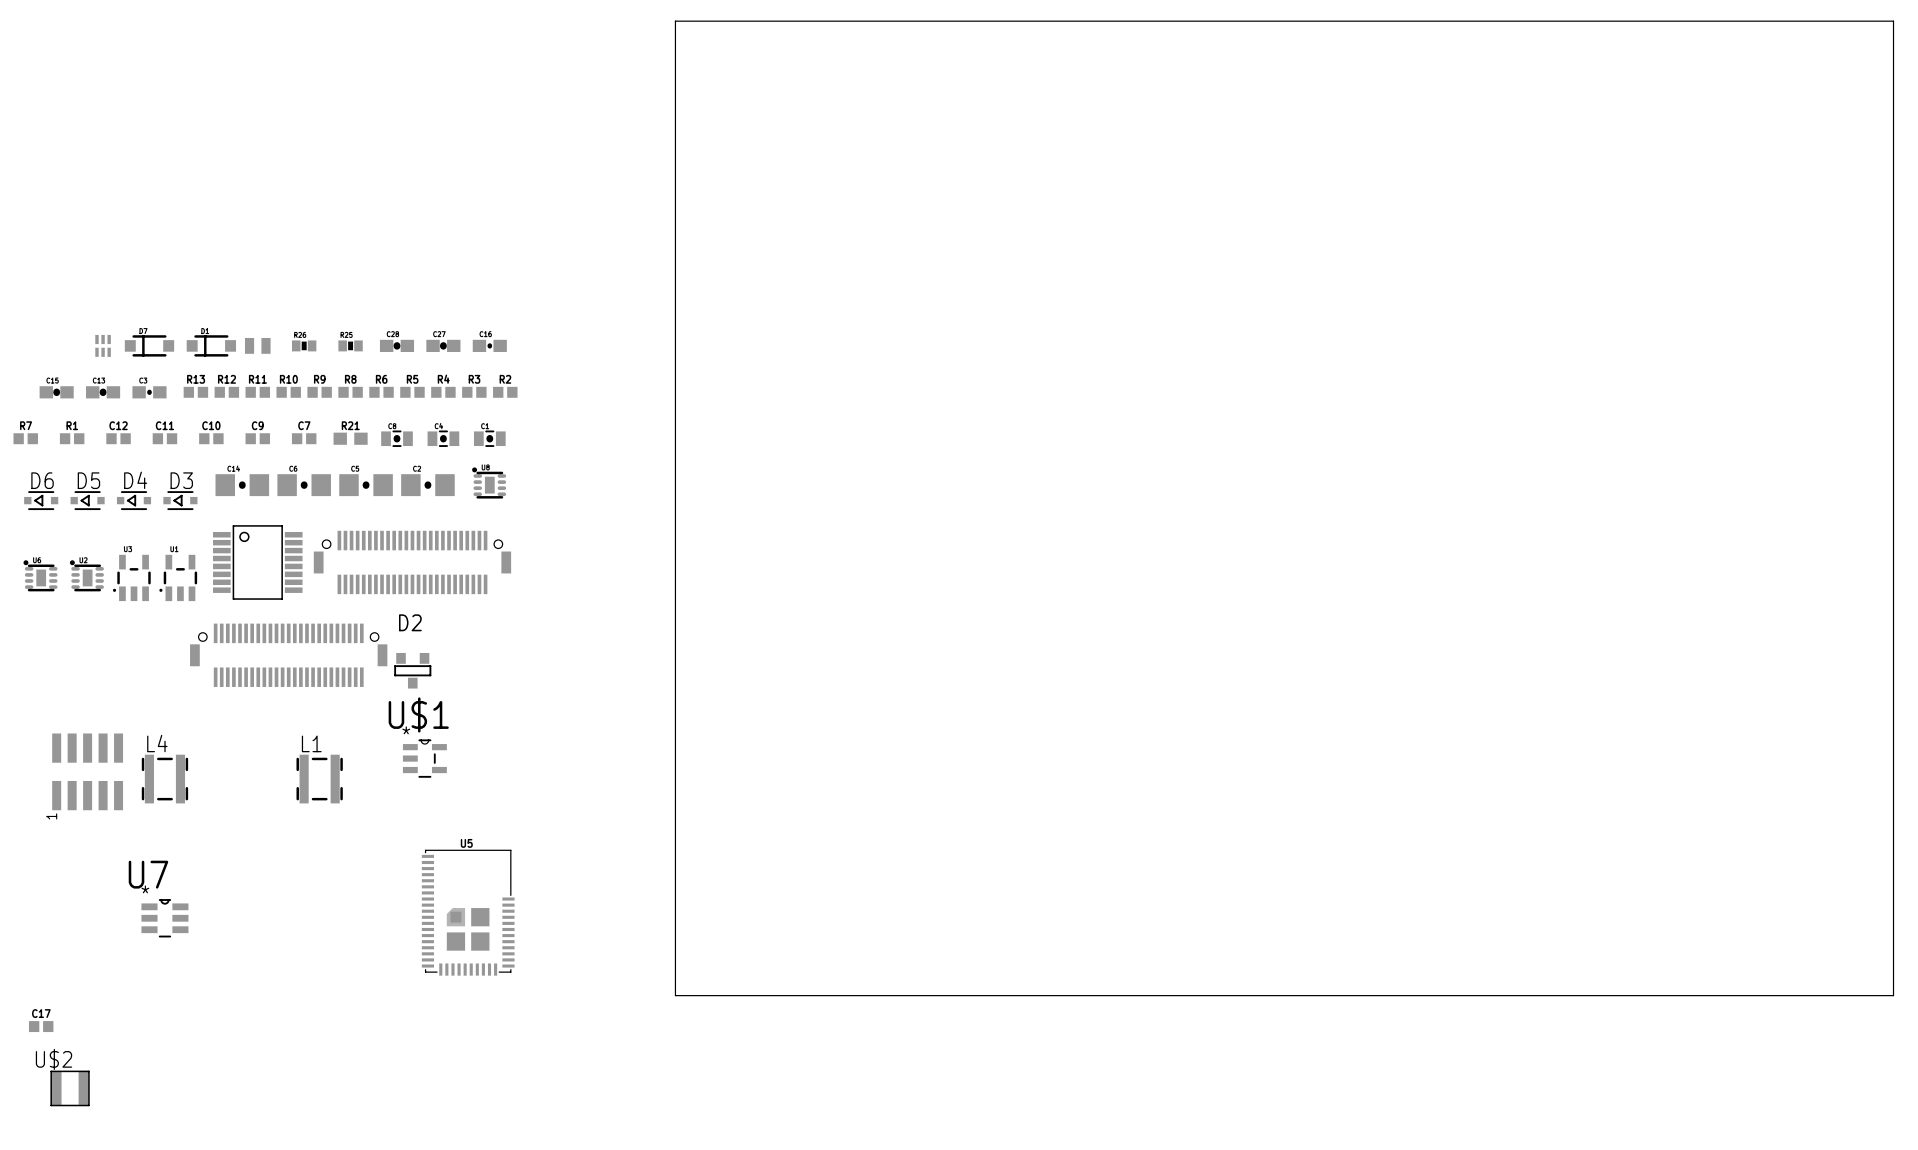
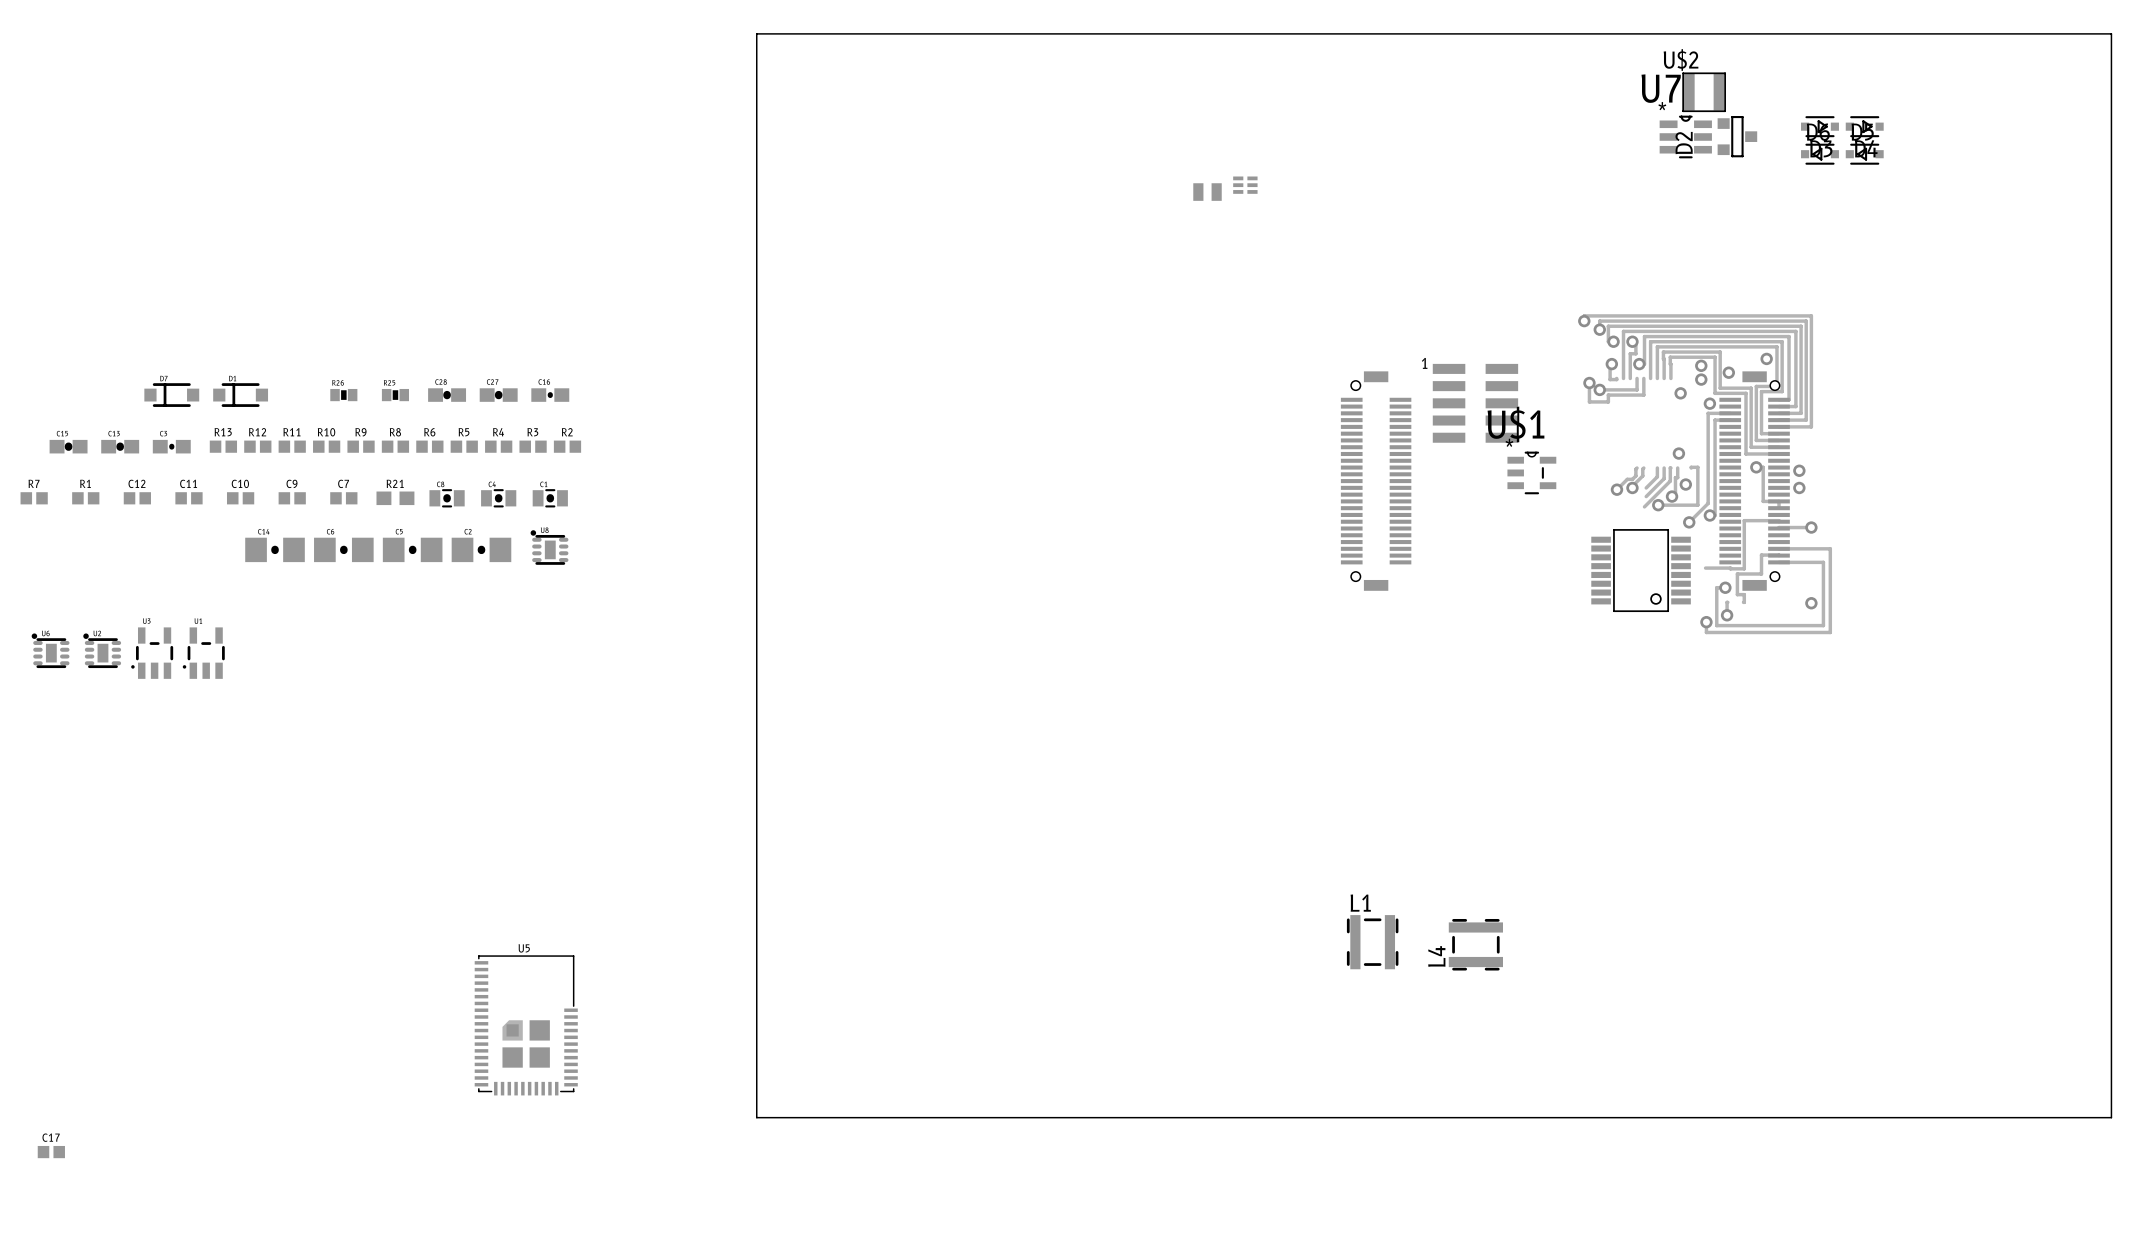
part: none -> (1245, 185)
part: none -> (1207, 192)
track: none -> (1584, 321) (1584, 315) (1811, 315) (1811, 426) (1779, 426)
via: none -> (1584, 321)
track: none -> (1599, 329) (1599, 321) (1806, 321) (1806, 420) (1779, 420)
via: none -> (1599, 329)
track: none -> (1613, 341) (1608, 341) (1608, 326) (1801, 326) (1801, 413) (1779, 413)
via: none -> (1613, 341)
track: none -> (1632, 341) (1635, 341) (1635, 353) (1630, 353) (1630, 378)
via: none -> (1632, 341)
via: none -> (1766, 358)
track: none -> (1611, 364) (1610, 364) (1610, 379) (1616, 378)
via: none -> (1611, 364)
track: none -> (1639, 364) (1644, 364) (1644, 336) (1789, 336) (1789, 399) (1779, 399)
via: none -> (1639, 364)
via: none -> (1701, 365)
via: none -> (1728, 372)
track: none -> (1623, 378) (1623, 331) (1795, 331) (1795, 406) (1779, 406)
track: none -> (1637, 378) (1637, 389) (1599, 389)
track: none -> (1643, 378) (1643, 395) (1608, 395) (1608, 401) (1589, 401) (1589, 383)
track: none -> (1650, 378) (1650, 341) (1782, 341) (1782, 391) (1761, 391) (1761, 433) (1779, 433)
track: none -> (1657, 378) (1657, 346) (1776, 346) (1776, 386) (1756, 386) (1756, 440) (1779, 440)
track: none -> (1664, 378) (1663, 352) (1720, 352) (1720, 388) (1751, 388) (1751, 447) (1779, 447)
track: none -> (1670, 378) (1670, 357) (1715, 357) (1715, 393) (1746, 393) (1746, 453) (1779, 453)
via: none -> (1701, 379)
via: none -> (1589, 383)
via: none -> (1599, 389)
via: none -> (1680, 393)
part: (103, 345) -> none
part: (257, 345) -> none
part: none -> (1475, 403)
via: none -> (1709, 403)
track: none -> (1730, 413) (1708, 413) (1708, 503) (1689, 522)
track: none -> (1730, 420) (1715, 420) (1715, 515) (1709, 515)
via: none -> (1678, 453)
track: none -> (1756, 467) (1763, 467) (1763, 501) (1779, 501) (1779, 508)
via: none -> (1756, 467)
track: none -> (1637, 468) (1635, 475) (1632, 479) (1627, 479) (1616, 489)
track: none -> (1643, 468) (1642, 475) (1632, 487)
track: none -> (1657, 468) (1657, 476) (1646, 487)
track: none -> (1664, 468) (1664, 478) (1646, 496)
track: none -> (1670, 468) (1670, 481) (1644, 506)
track: none -> (1677, 468) (1675, 496) (1672, 496)
track: none -> (1691, 468) (1697, 467) (1697, 505) (1658, 505)
via: none -> (1799, 470)
part: none -> (1376, 481)
part: none -> (1754, 481)
via: none -> (1685, 484)
via: none -> (1632, 487)
via: none -> (1799, 487)
via: none -> (1616, 489)
via: none -> (1672, 496)
via: none -> (1658, 505)
via: none -> (1709, 515)
track: none -> (1779, 521) (1744, 520) (1744, 568) (1705, 568)
via: none -> (1689, 522)
track: none -> (1811, 527) (1779, 528)
via: none -> (1811, 527)
track: none -> (1779, 548) (1830, 548) (1830, 632) (1706, 632) (1706, 622)
track: none -> (1779, 555) (1761, 555) (1761, 573) (1737, 573) (1737, 594) (1744, 594) (1743, 602)
track: none -> (1779, 562) (1823, 562) (1823, 625) (1716, 625) (1716, 587) (1725, 587)
D6 position: (41, 500) -> (1819, 154)
D5 position: (87, 500) -> (1864, 154)
D4 rotation: 0° (134, 500) -> 180° (1864, 126)
D4 position: (134, 500) -> (1864, 126)
D3 rotation: 0° (180, 500) -> 180° (1819, 126)
D3 position: (180, 500) -> (1819, 126)
part: none -> (1641, 570)
via: none -> (1725, 587)
track: none -> (1727, 602) (1727, 615)
via: none -> (1811, 603)
via: none -> (1727, 615)
via: none -> (1706, 622)
part: (257, 562) -> none
part: (412, 562) -> none
part: (288, 655) -> none
D2 rotation: 0° (412, 670) -> 90° counterclockwise (1737, 136)
D2 position: (412, 670) -> (1737, 136)
L4 name position: L4 (157, 743) -> L4 (1436, 956)
U$1 position: (424, 758) -> (1531, 472)
part: (87, 771) -> none
L4 rotation: 0° (164, 779) -> 90° clockwise (1475, 944)
L4 position: (164, 779) -> (1475, 944)
L1 position: (319, 779) -> (1372, 942)
U7 position: (164, 918) -> (1685, 136)
U$2 position: (70, 1088) -> (1704, 92)

